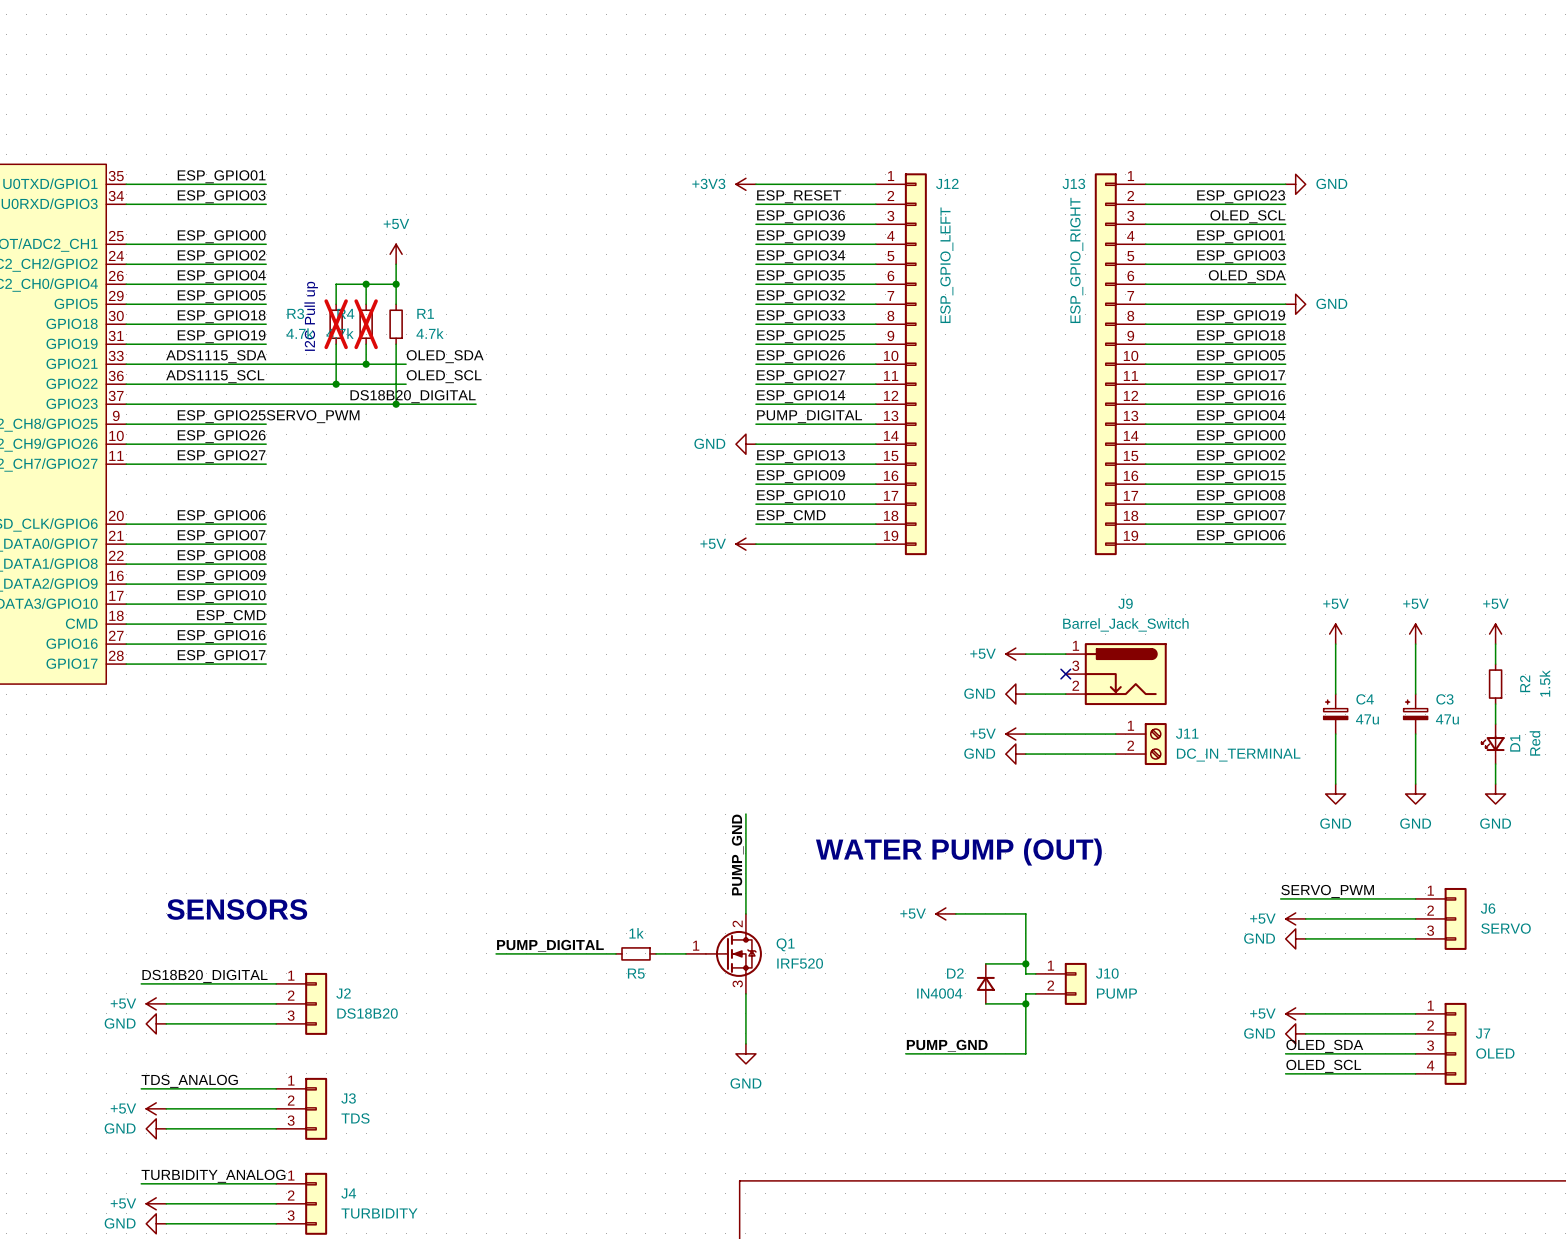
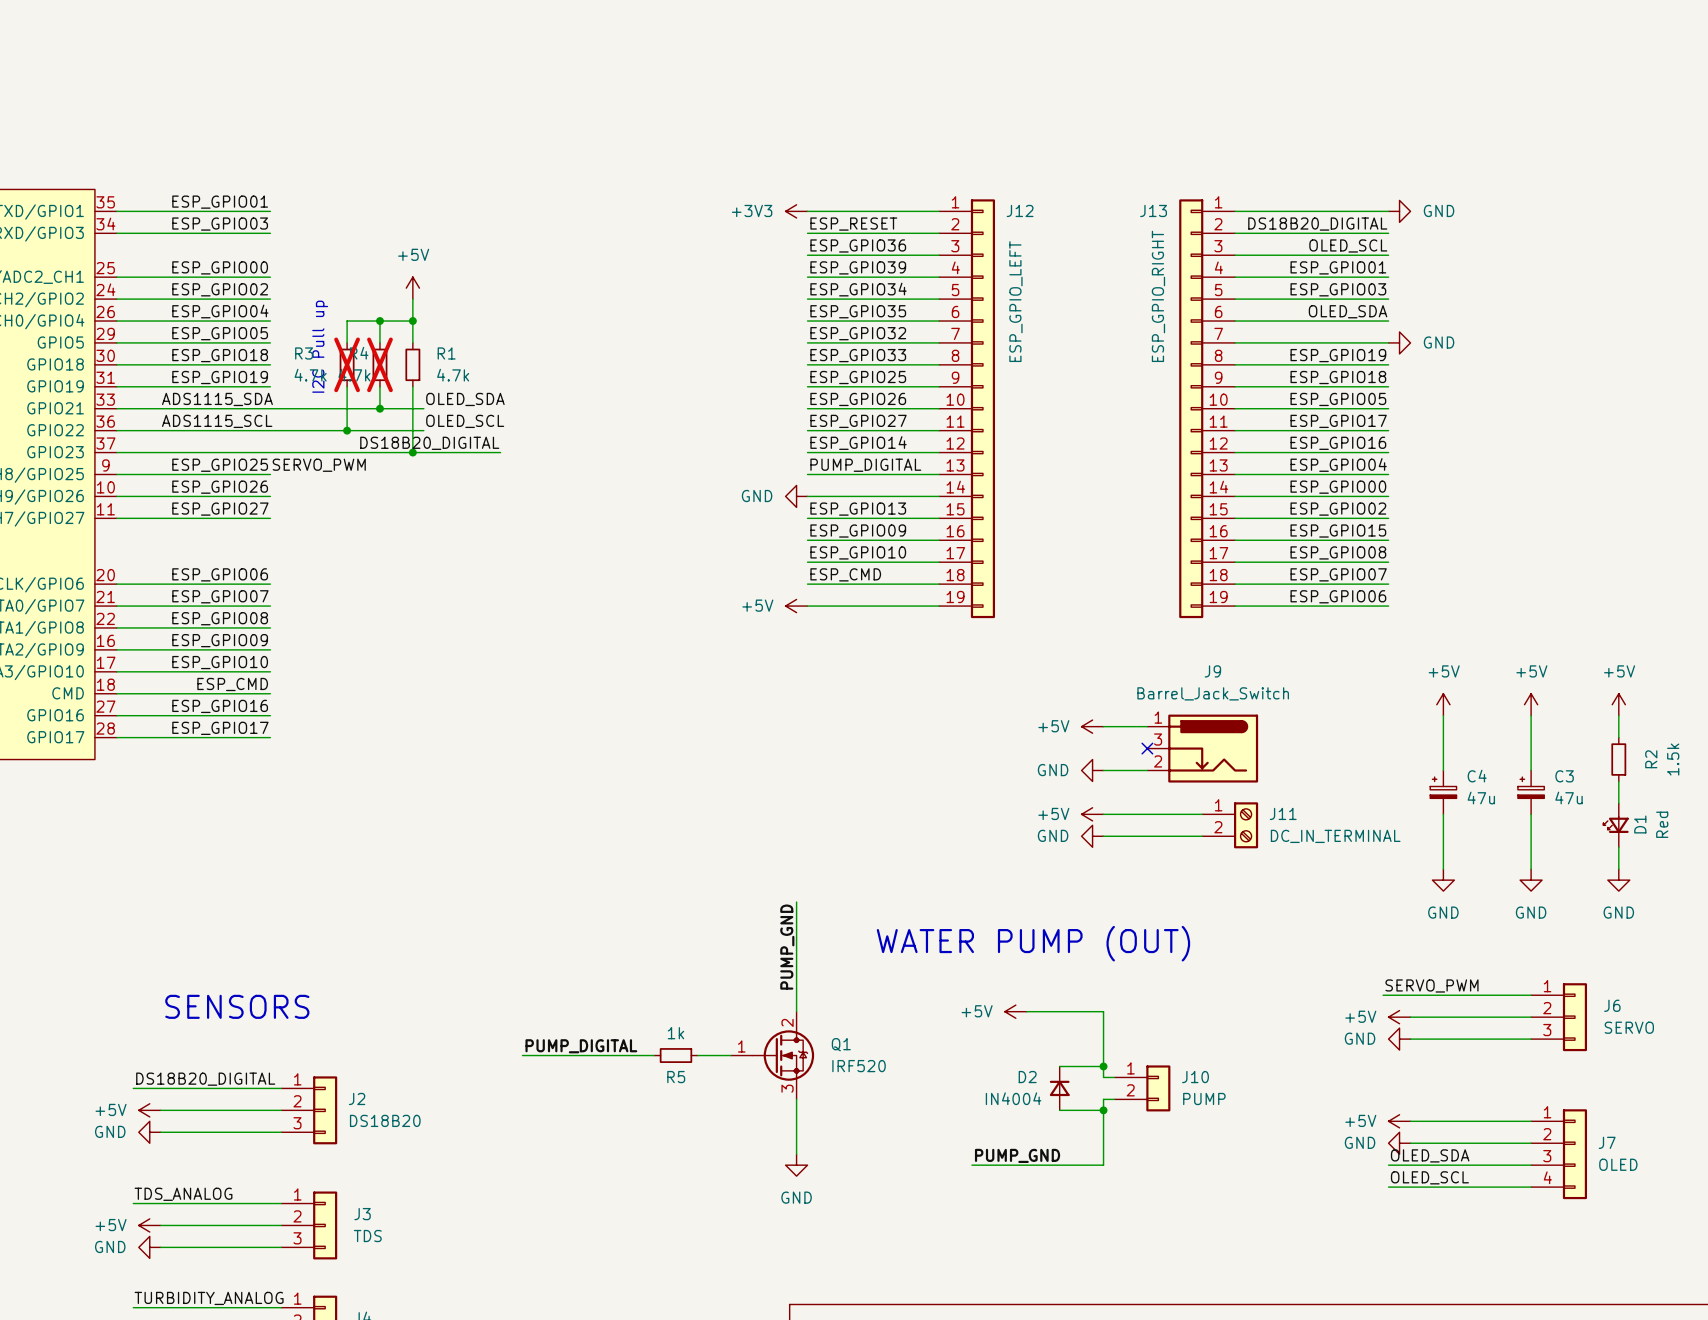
label: ESP_GPIO23 (1241, 196) -> DS18B20_DIGITAL (1317, 224)

